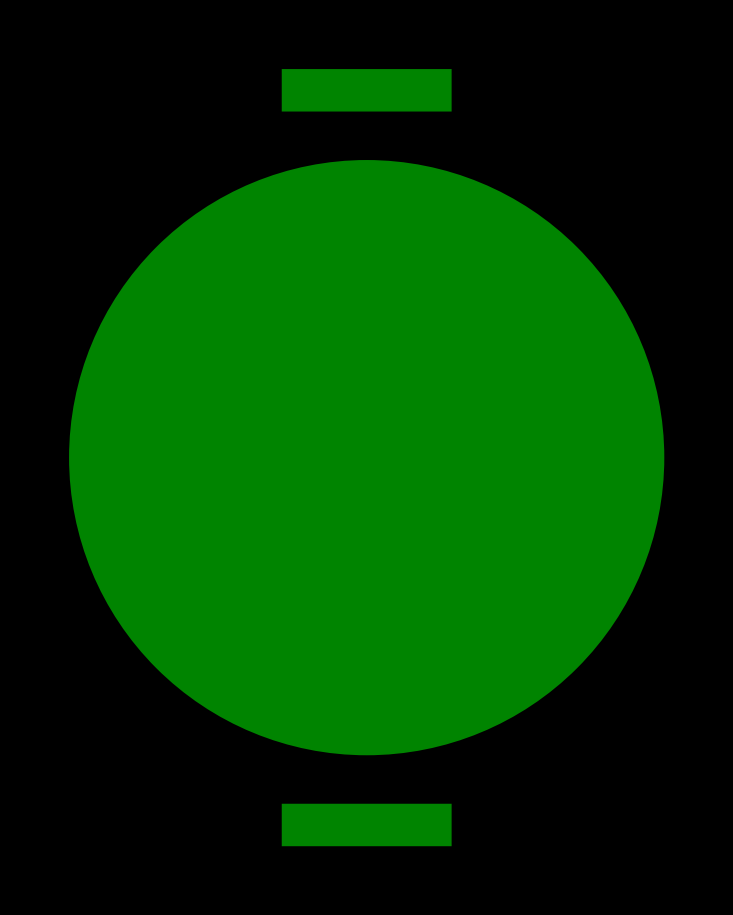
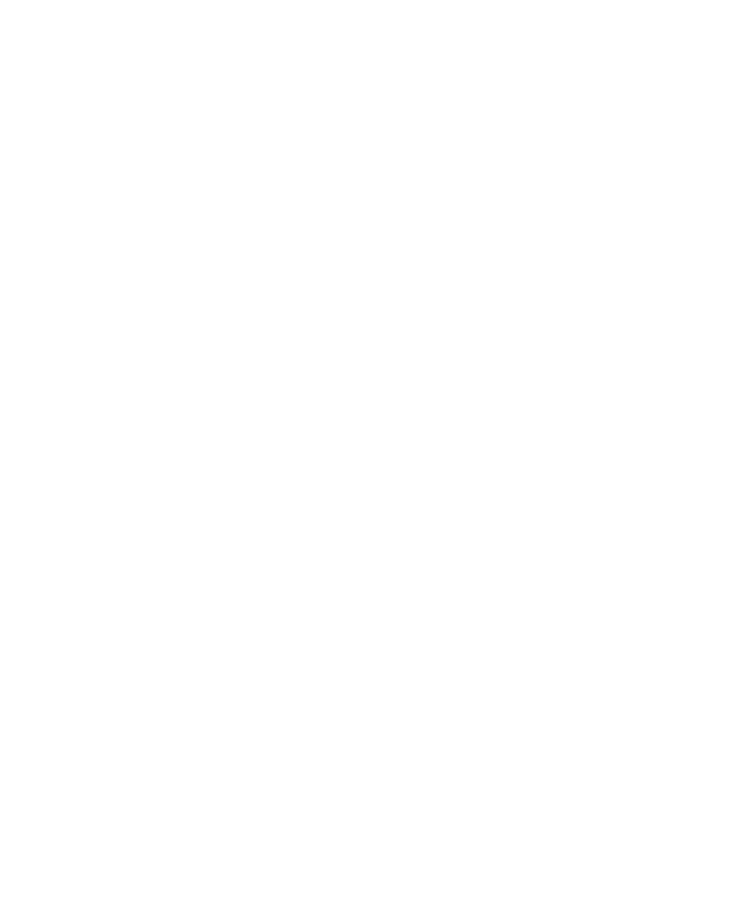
part: (366, 457) -> none

